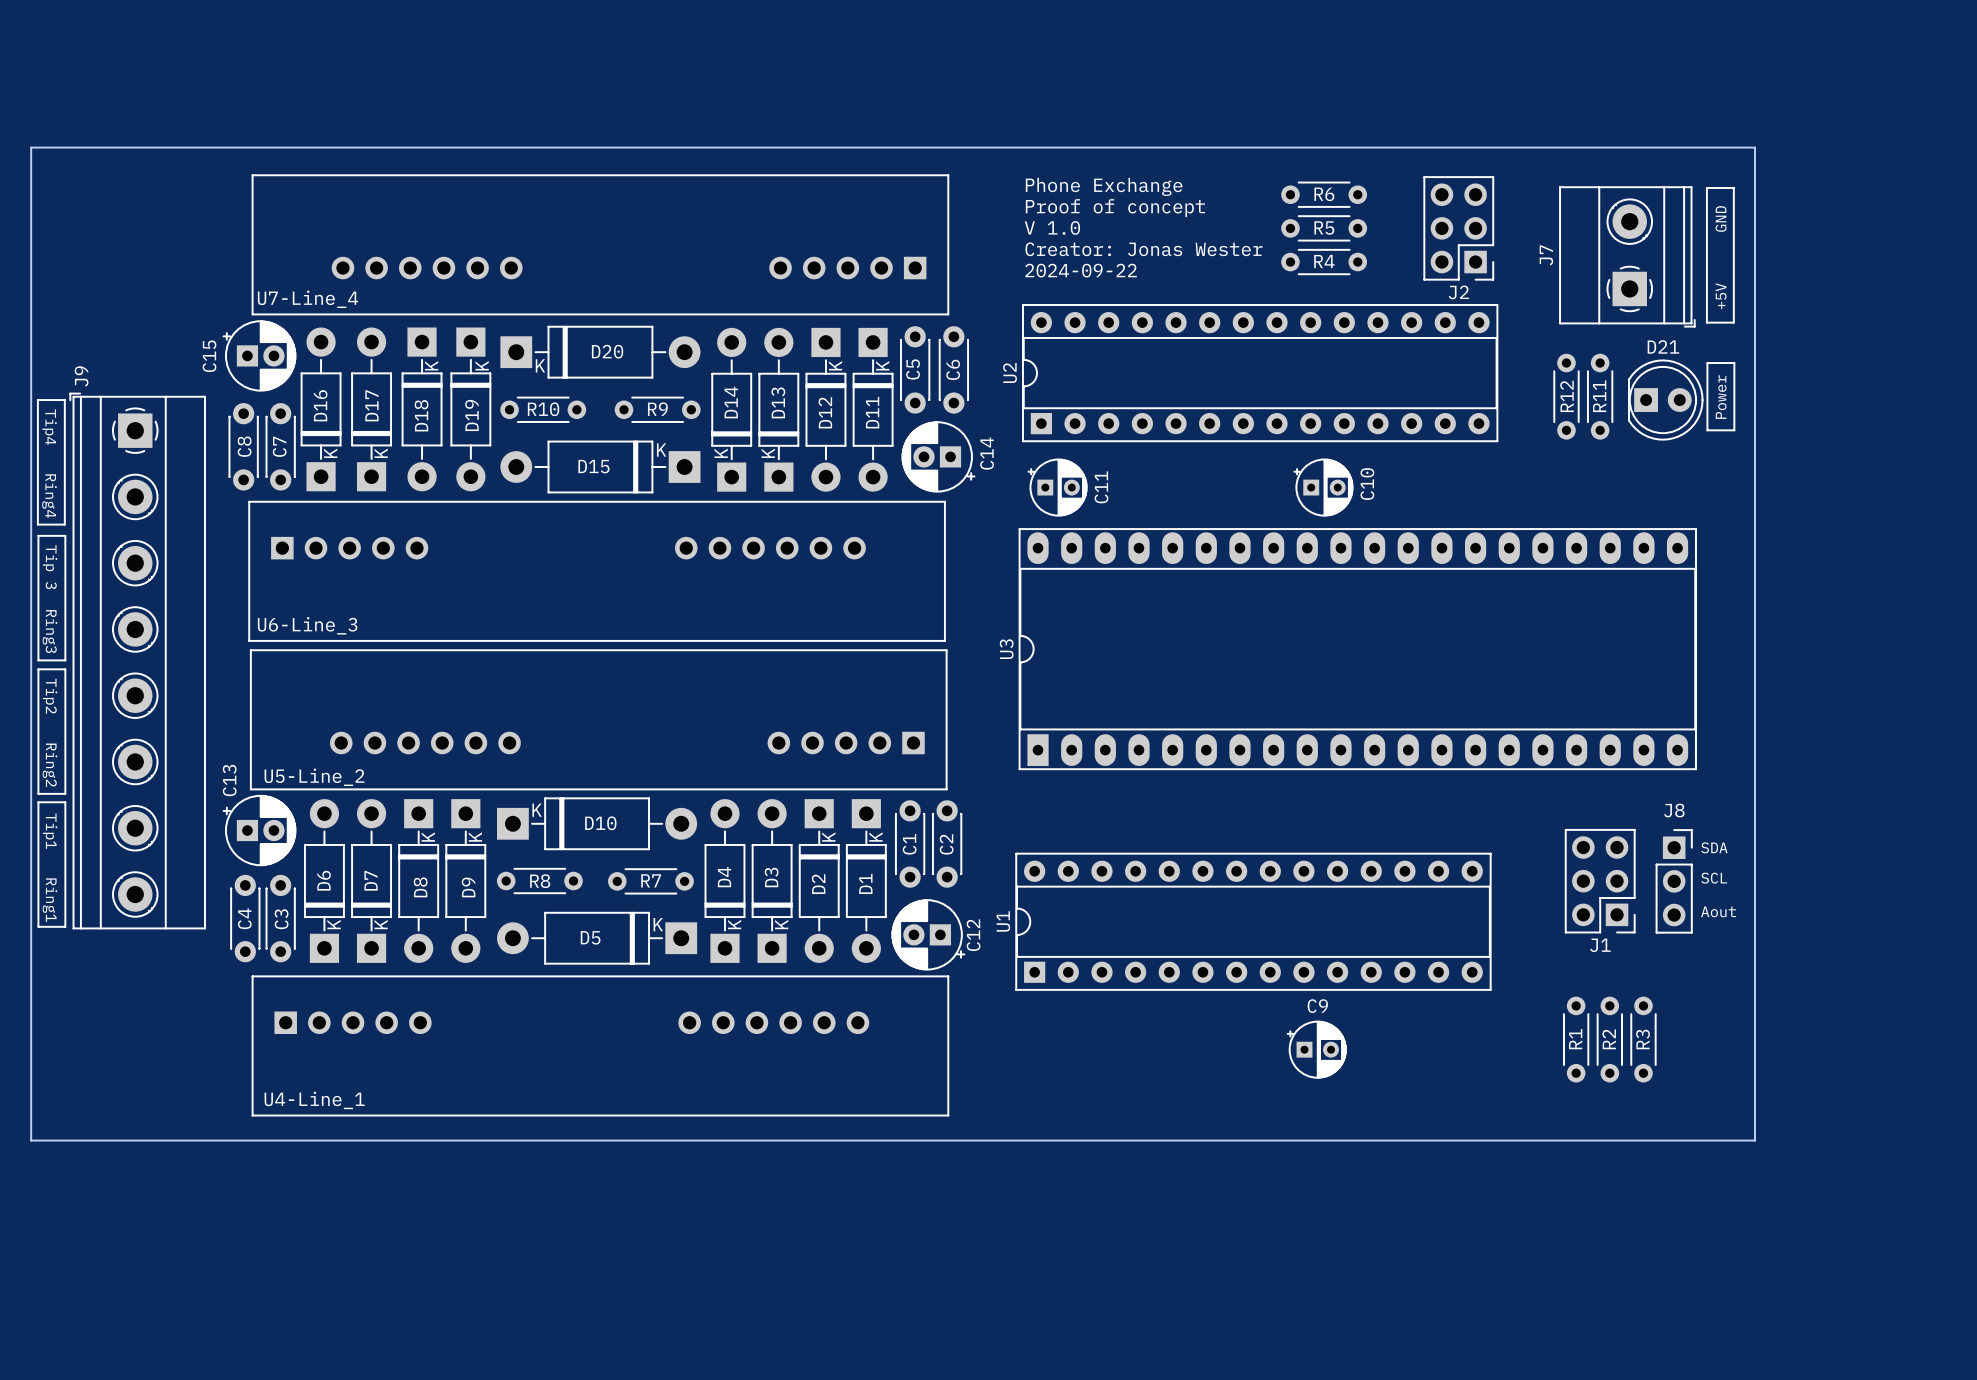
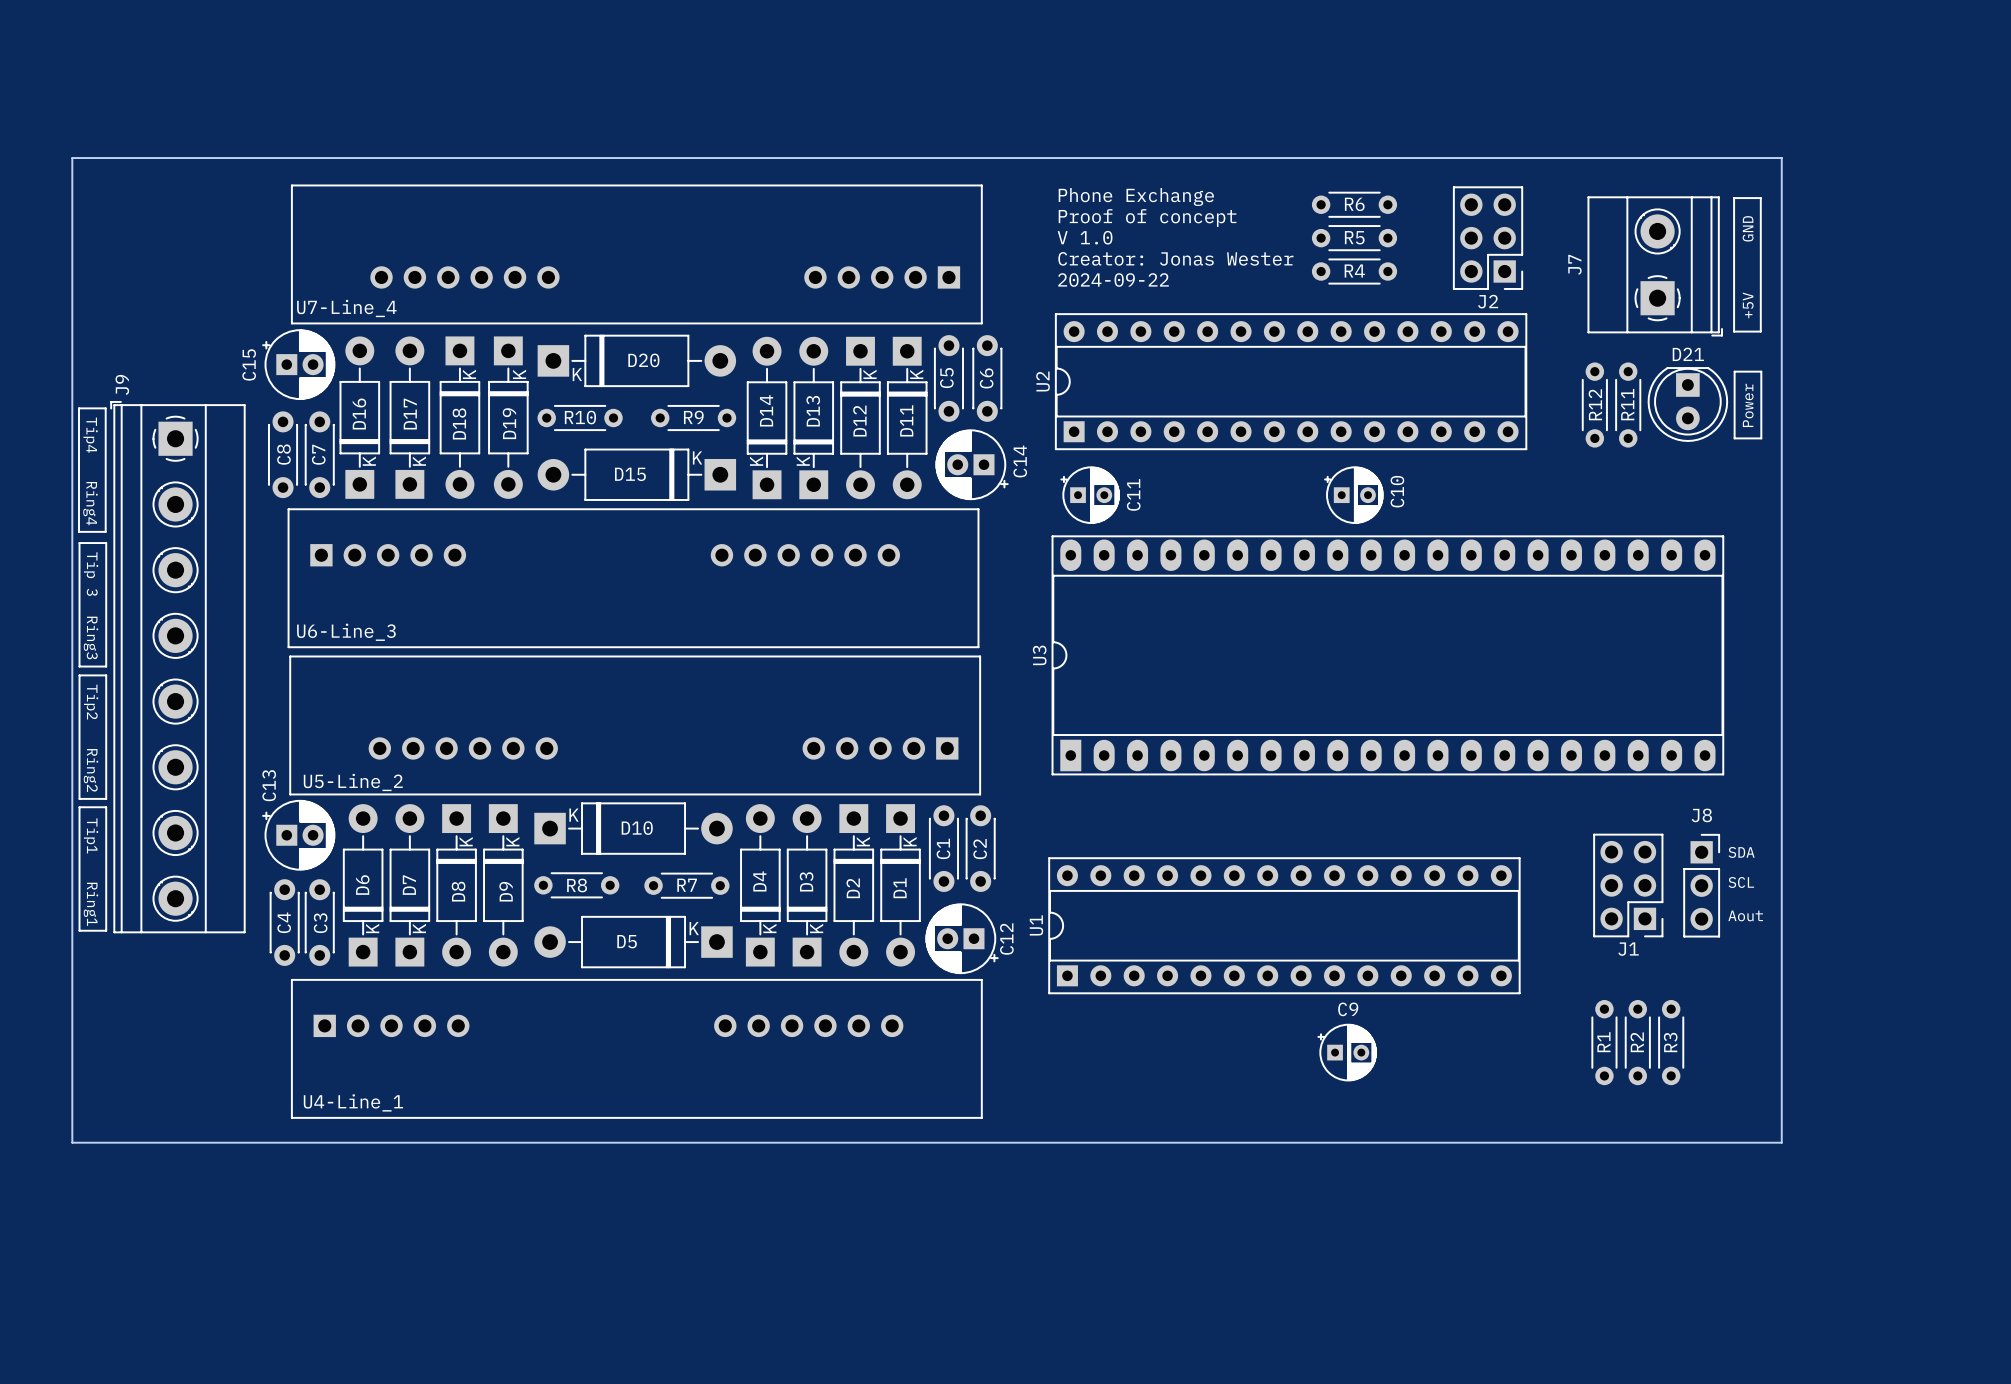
D21 rotation: 0° (1665, 400) -> 90° clockwise (1687, 404)

